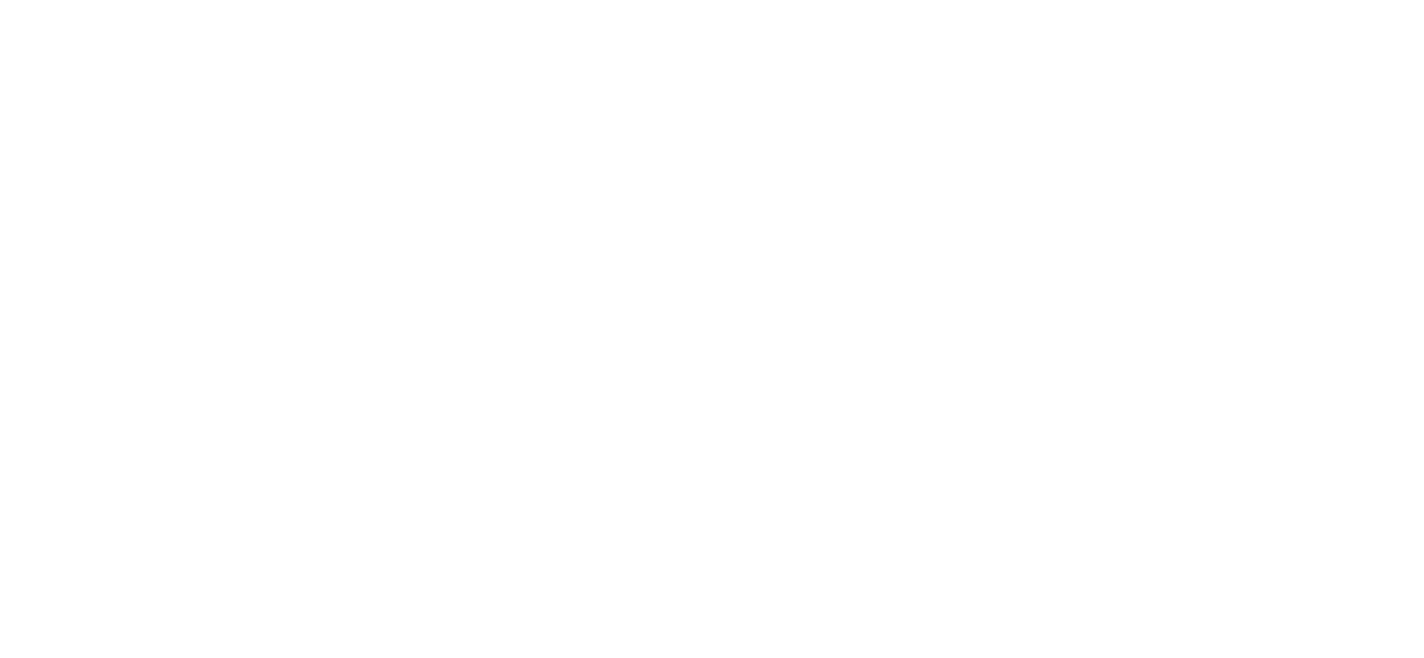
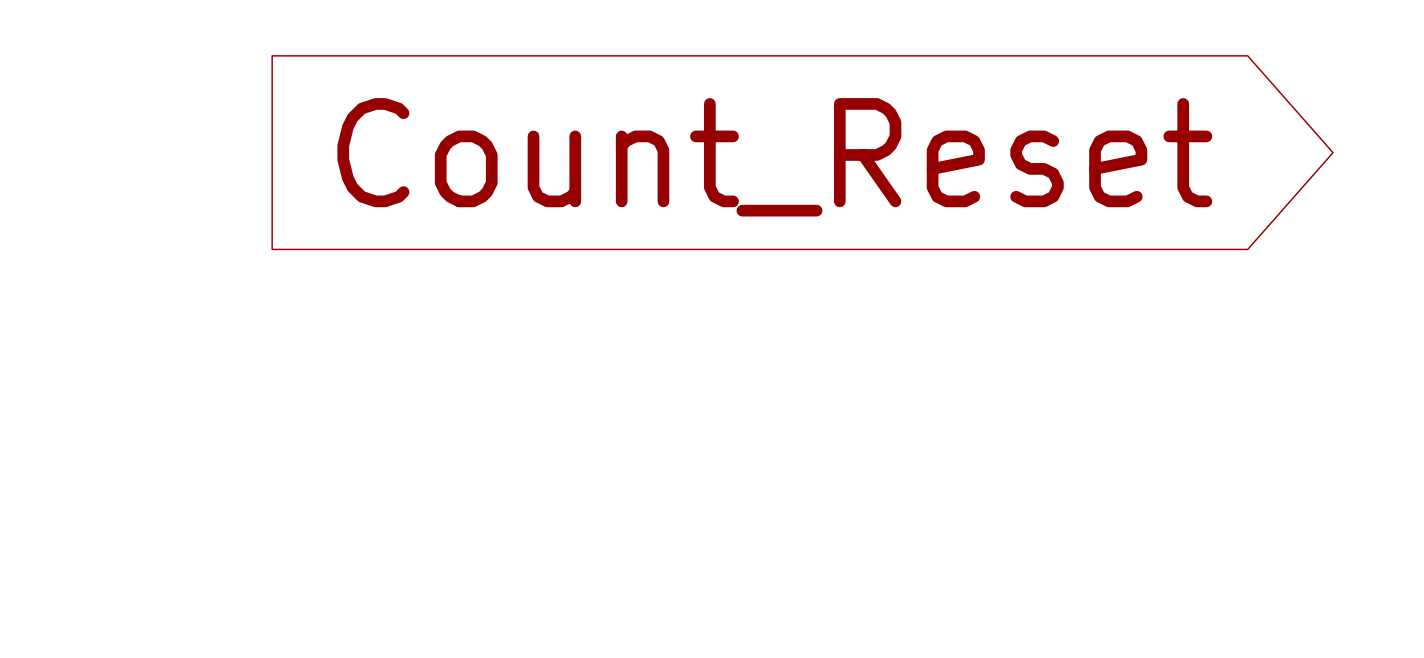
global label: none -> Count_Reset (774, 157)

